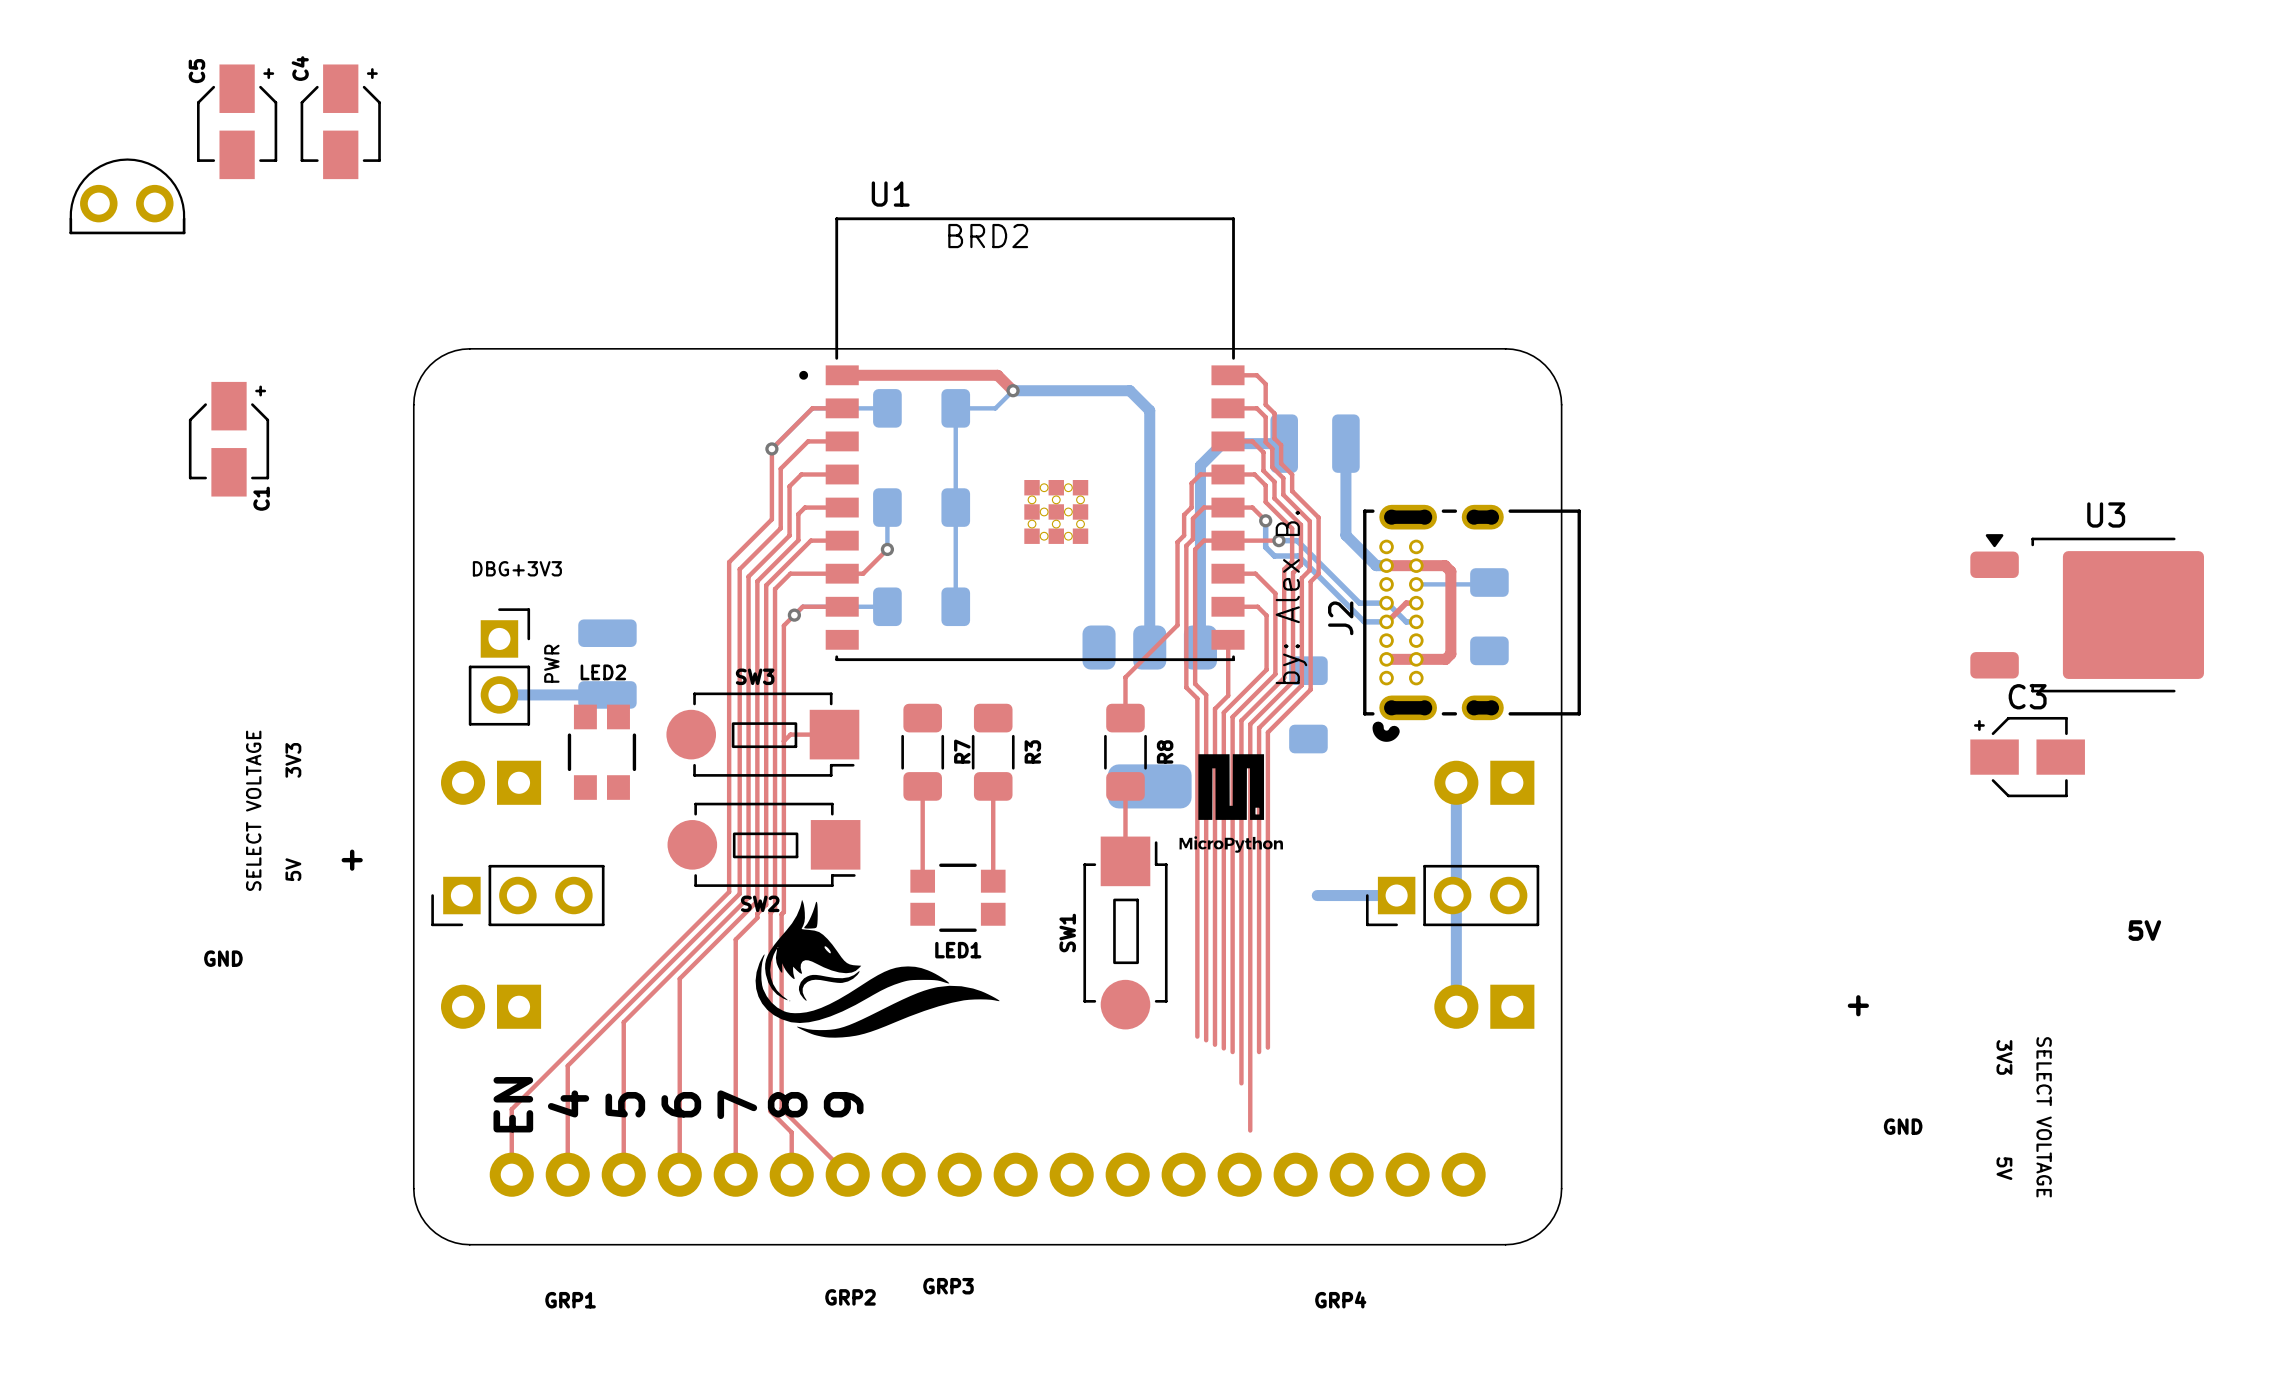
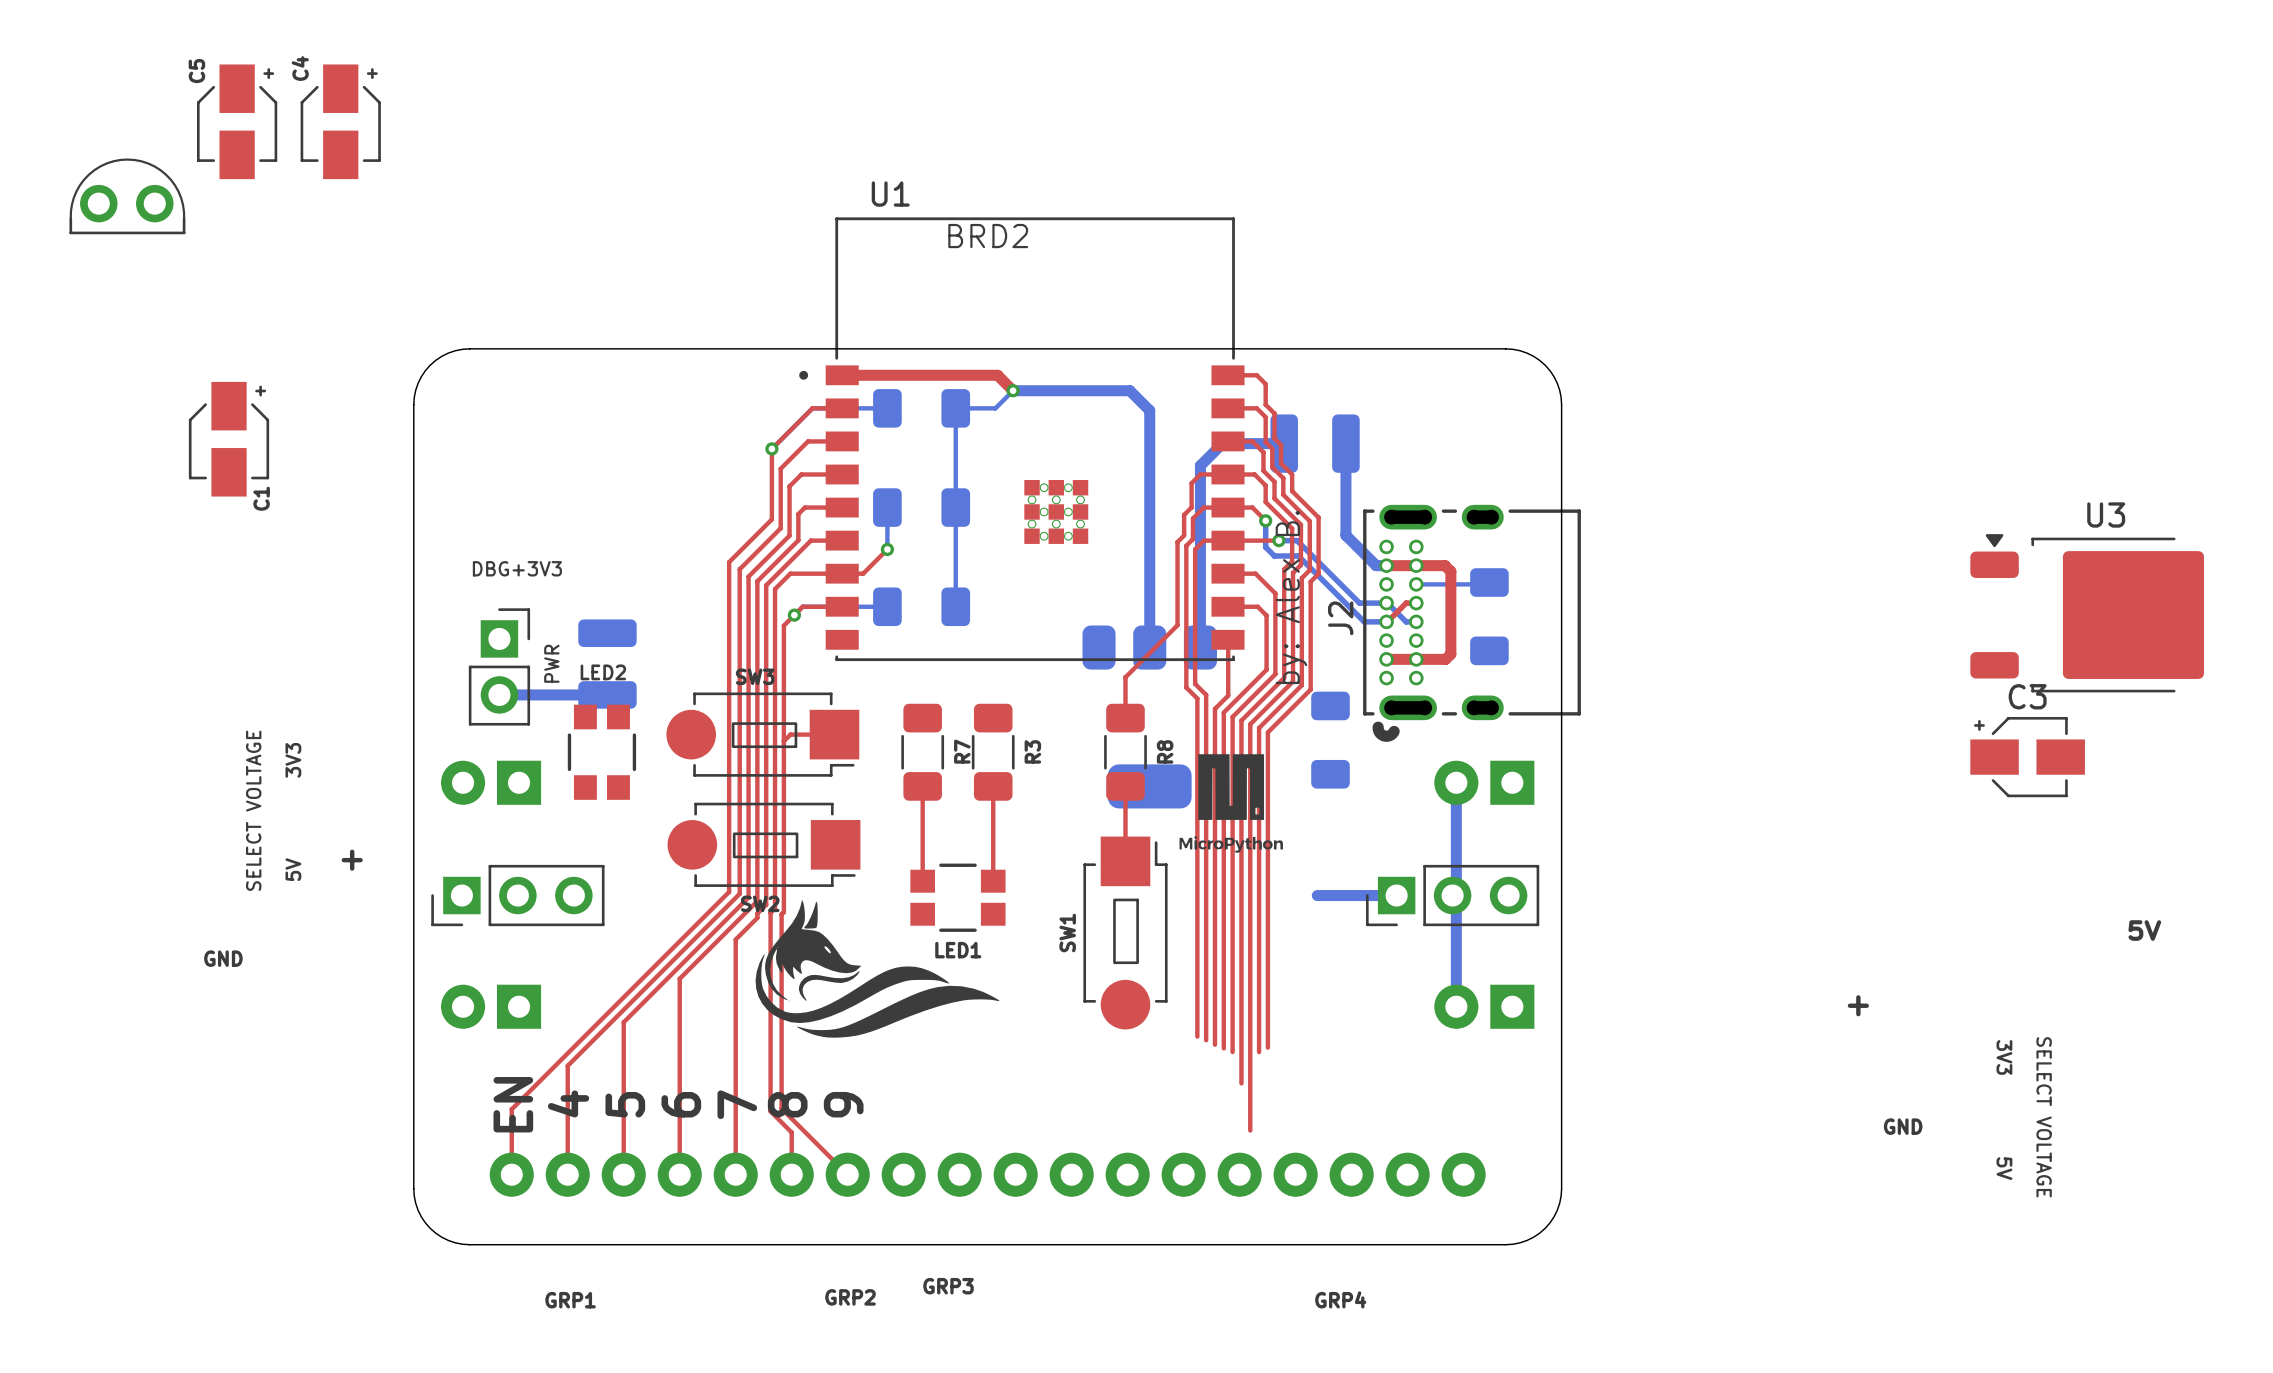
part position: (1308, 704) -> (1330, 740)

